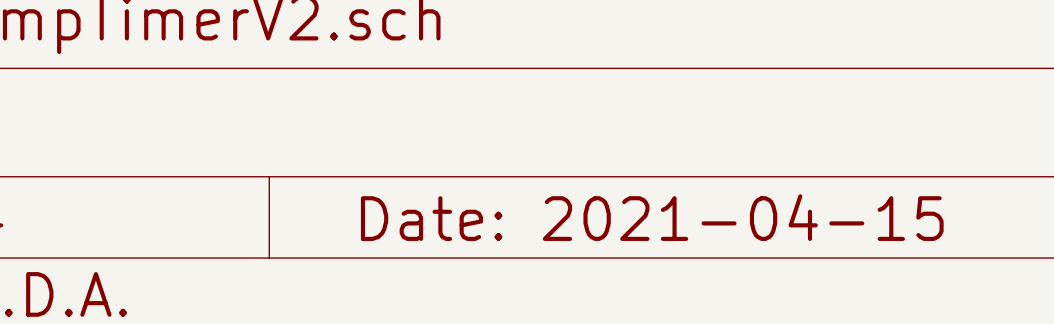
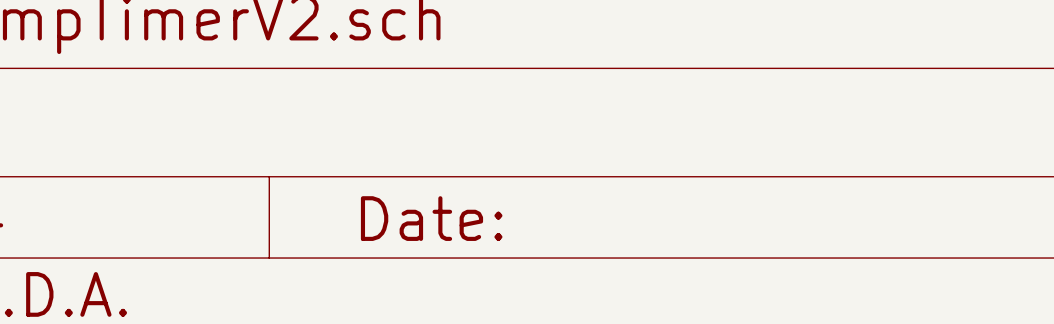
title block: Date: 2021-04-15 (652, 217) -> Date: (431, 218)

